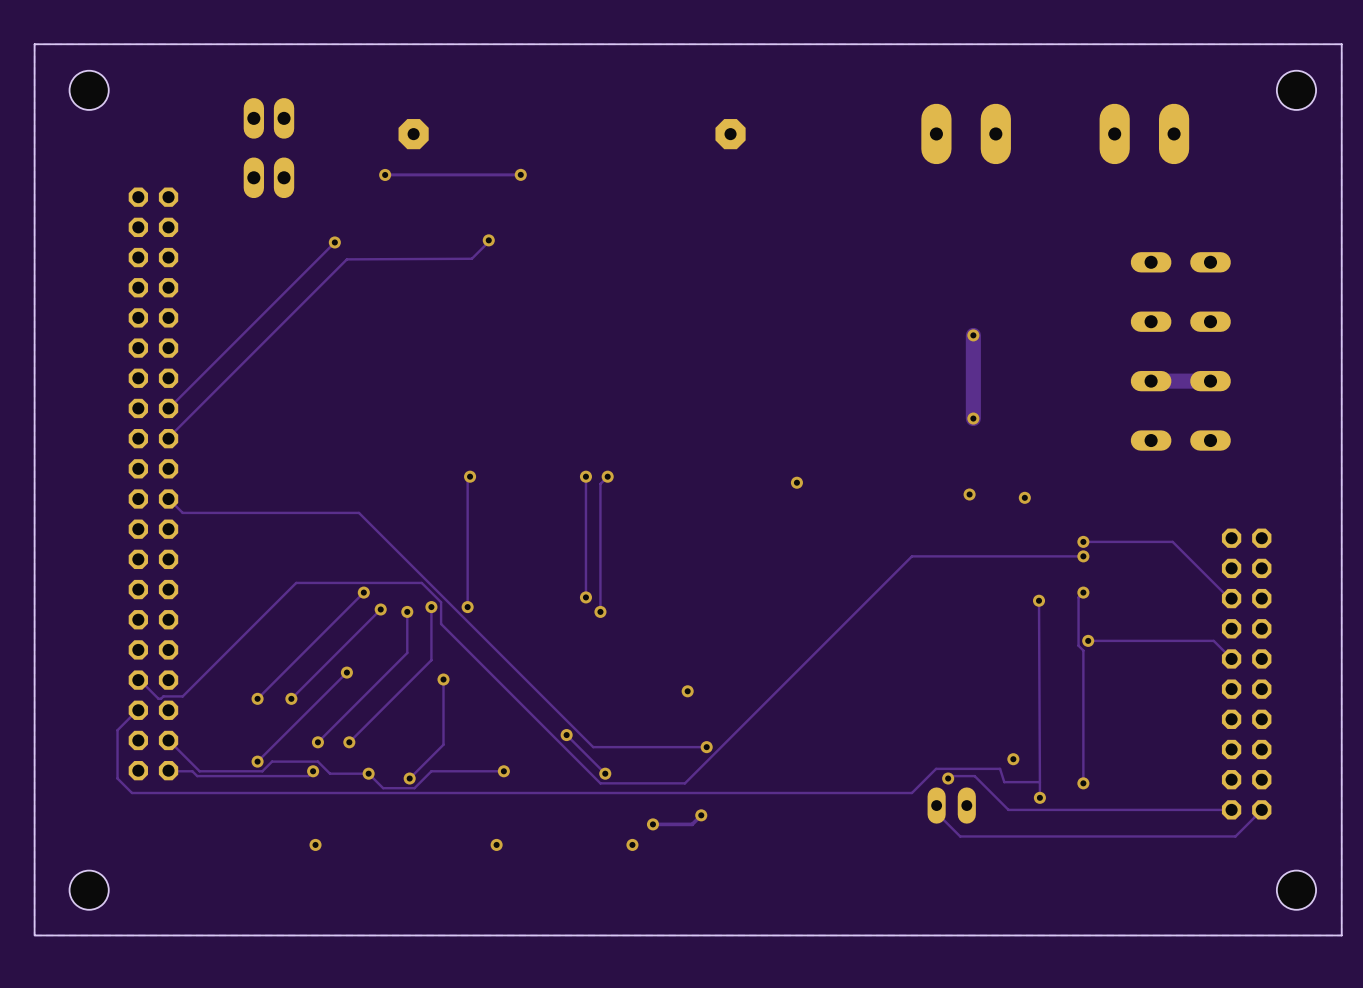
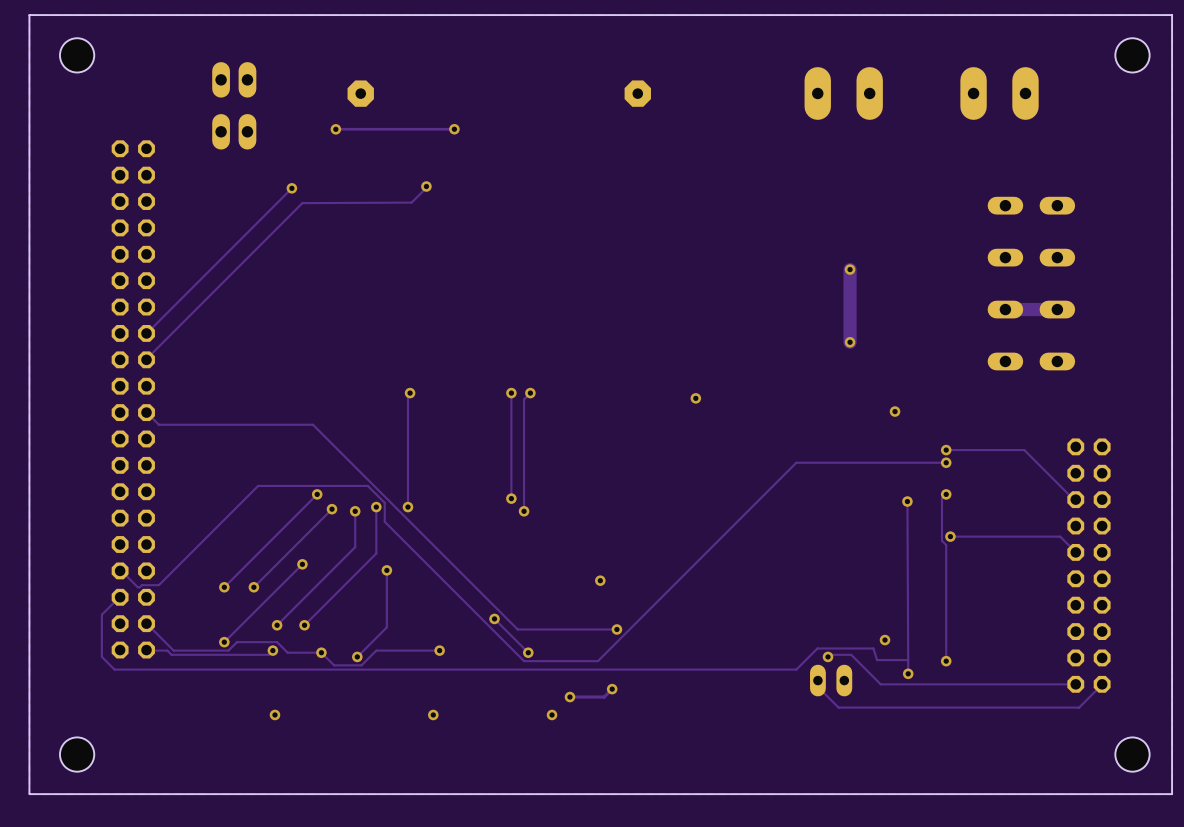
via: (969, 494) -> none

